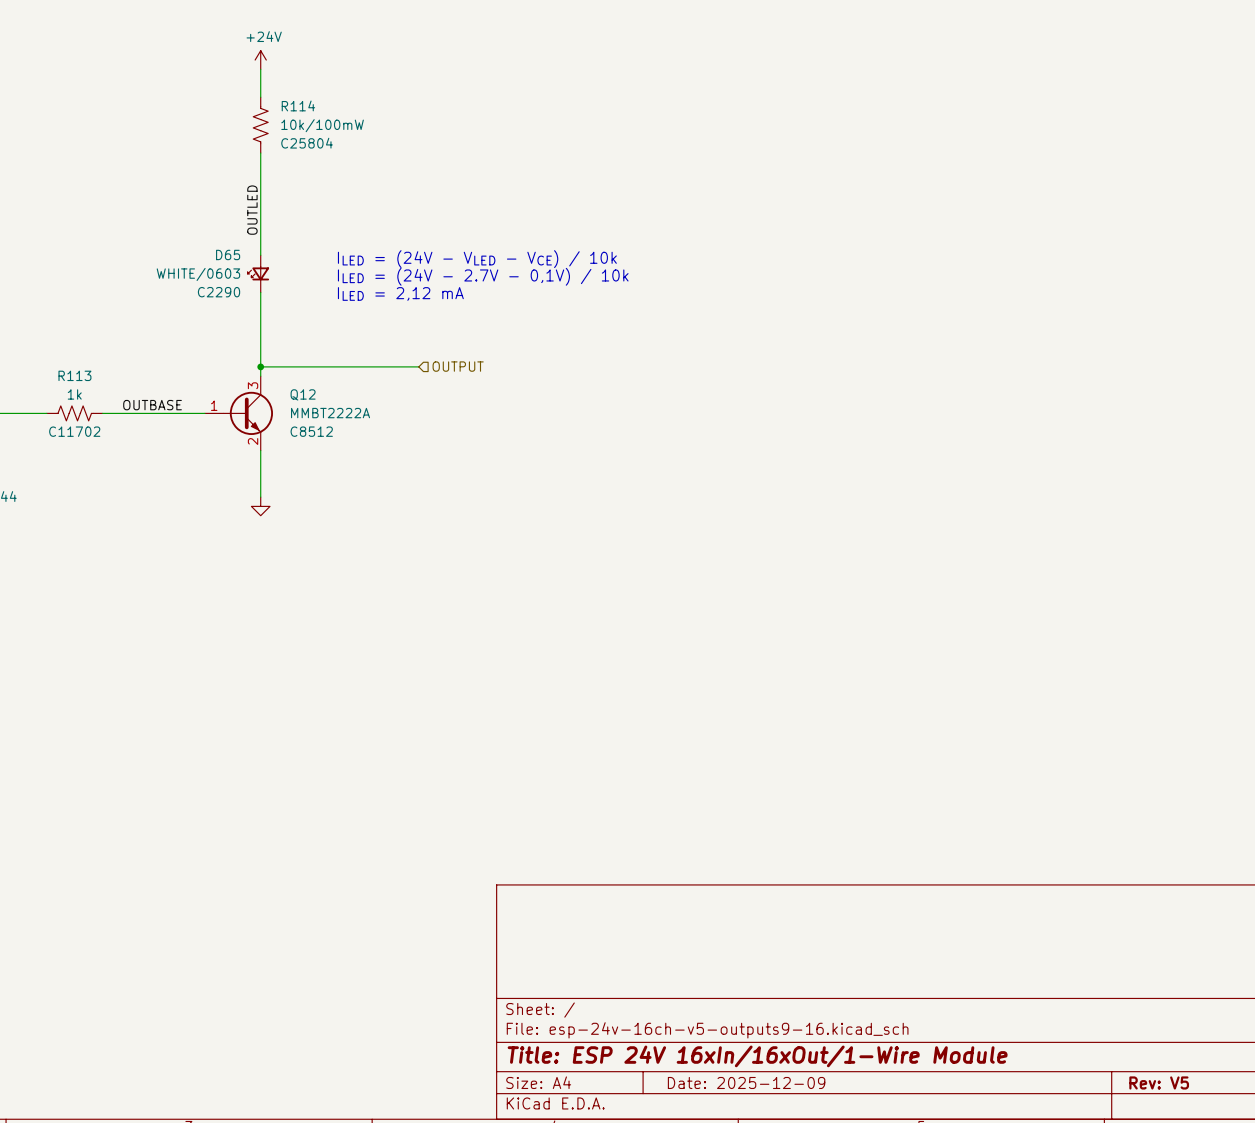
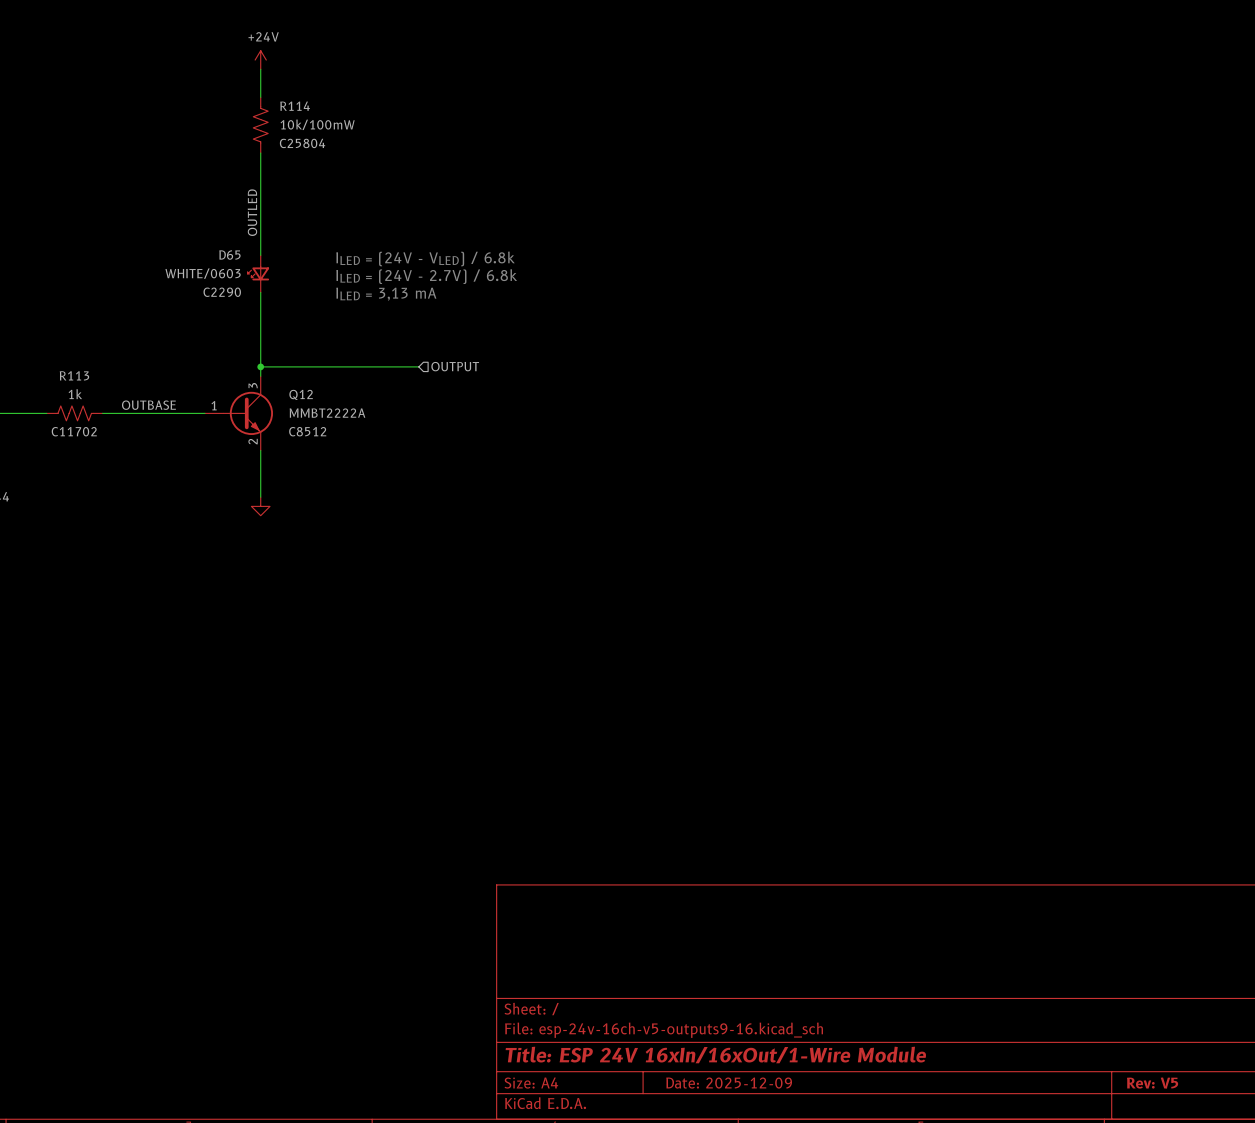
text: ILED = (24V - VLED - VCE) / 10k (477, 259) -> ILED = (24V - VLED) / 6.8k (425, 258)
text: ILED = (24V - 2.7V - 0,1V) / 10k (483, 276) -> ILED = (24V - 2.7V) / 6.8k (426, 276)
text: ILED = 2,12 mA (400, 293) -> ILED = 3,13 mA (386, 294)

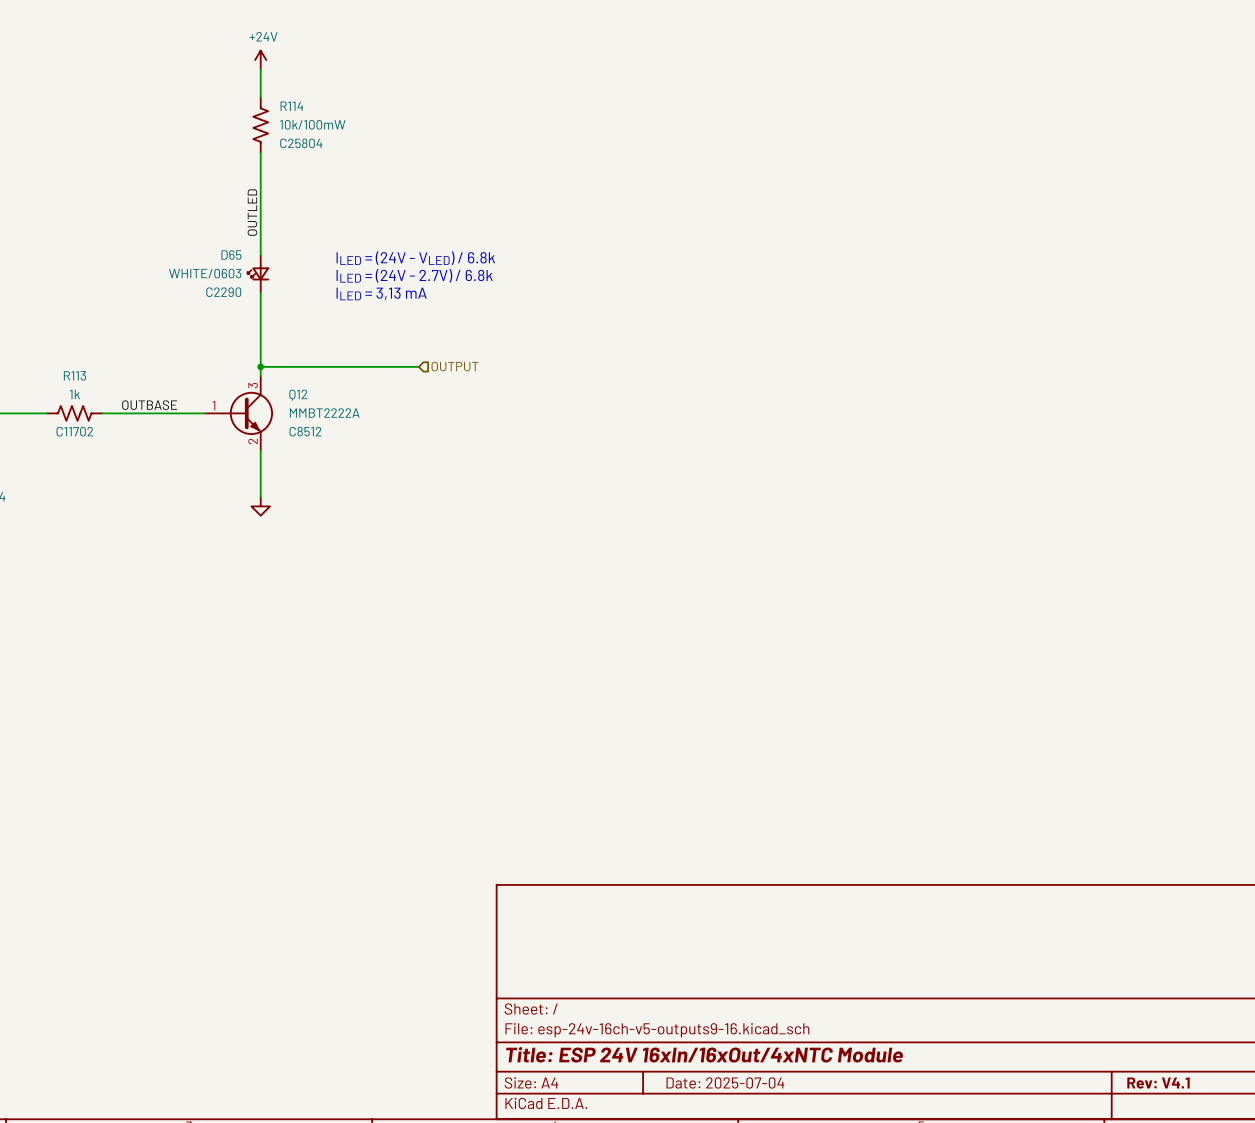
title block: Title: ESP 24V 16xIn/16xOut/1-Wire Module (715, 1054) -> Title: ESP 24V 16xIn/16xOut/4xNTC Module (704, 1054)
title block: Date: 2025-12-09 (729, 1083) -> Date: 2025-07-04 (725, 1082)
title block: Rev: V5 (1152, 1083) -> Rev: V4.1 (1158, 1083)

